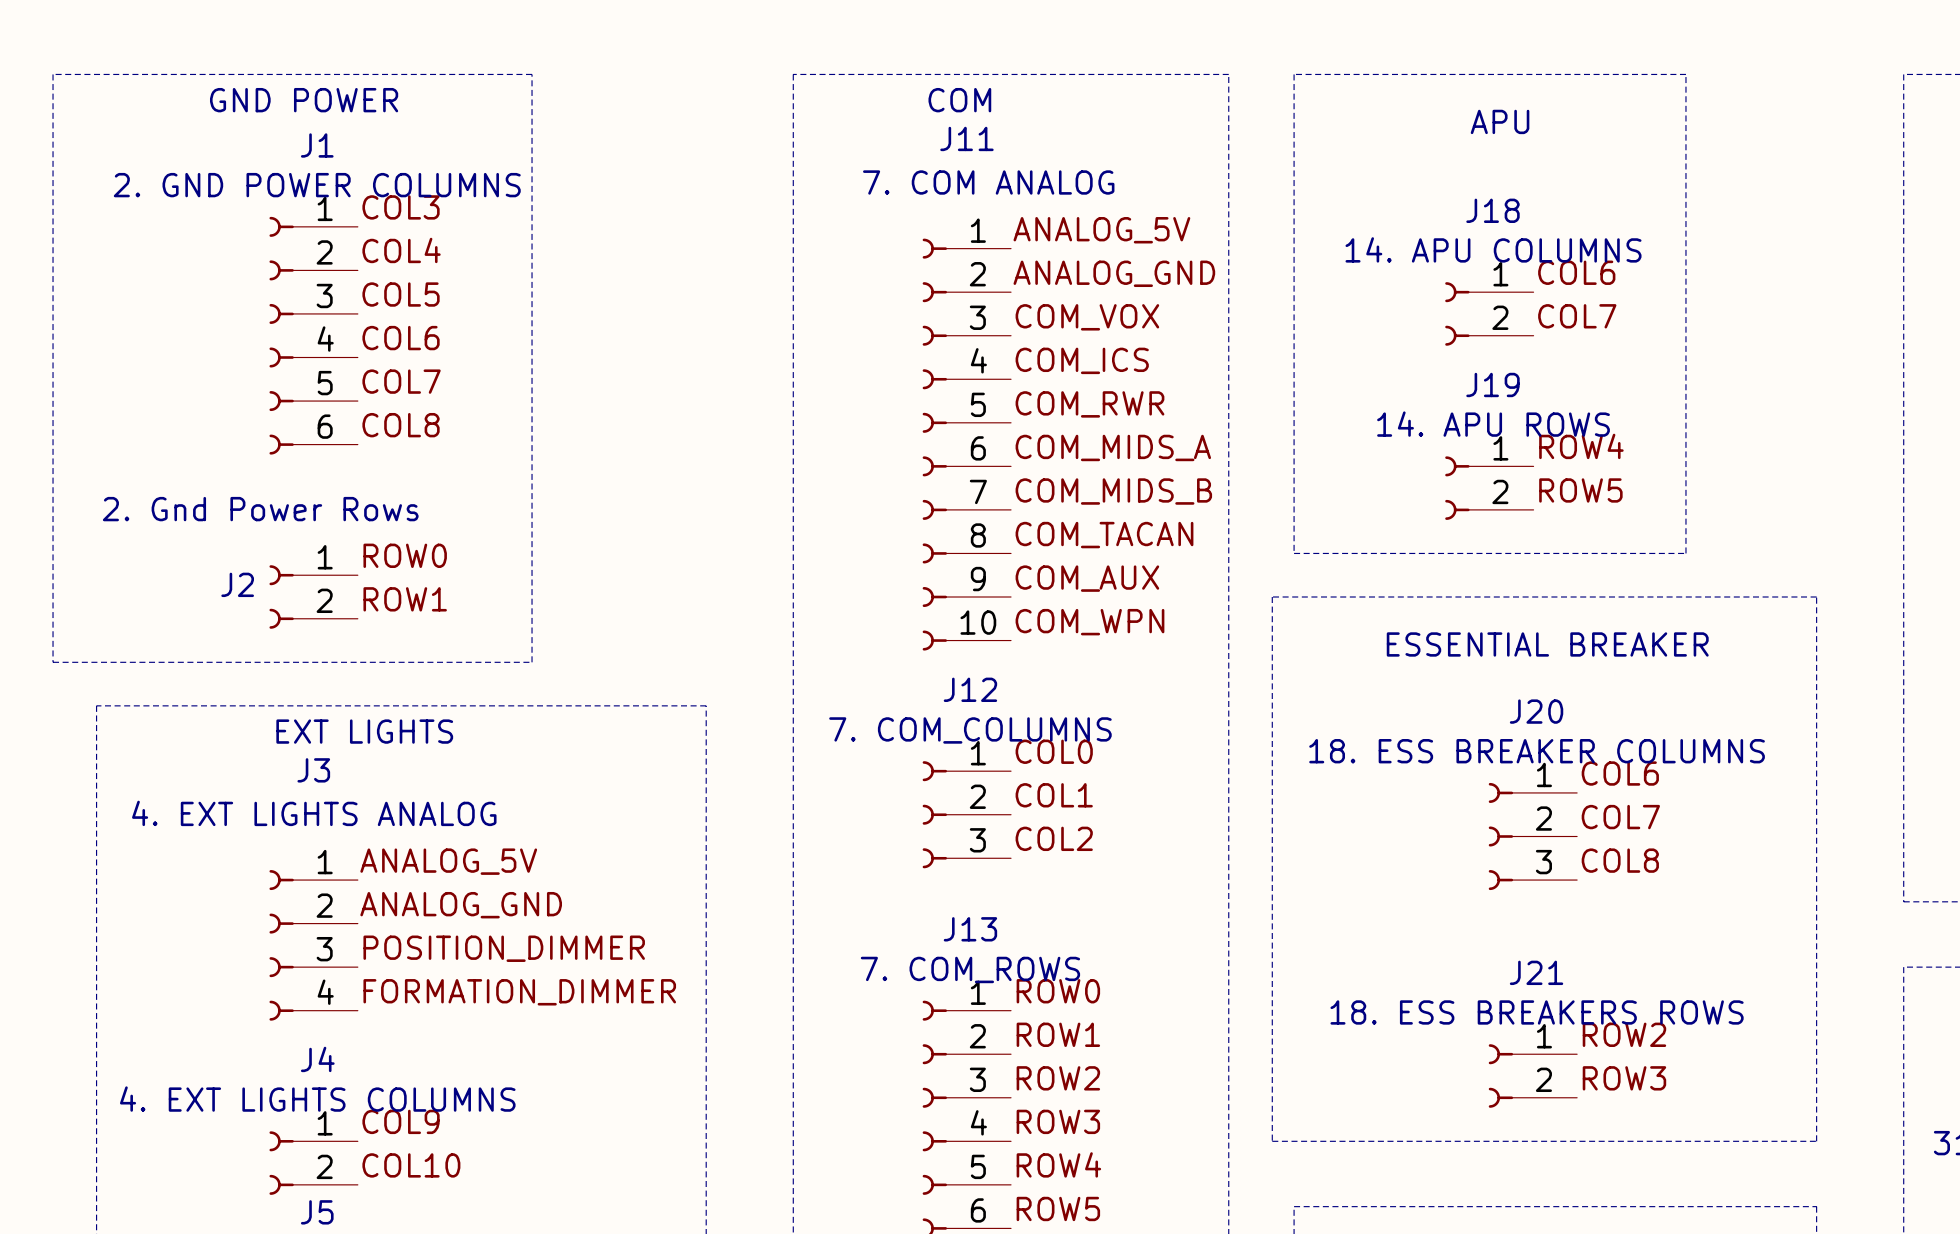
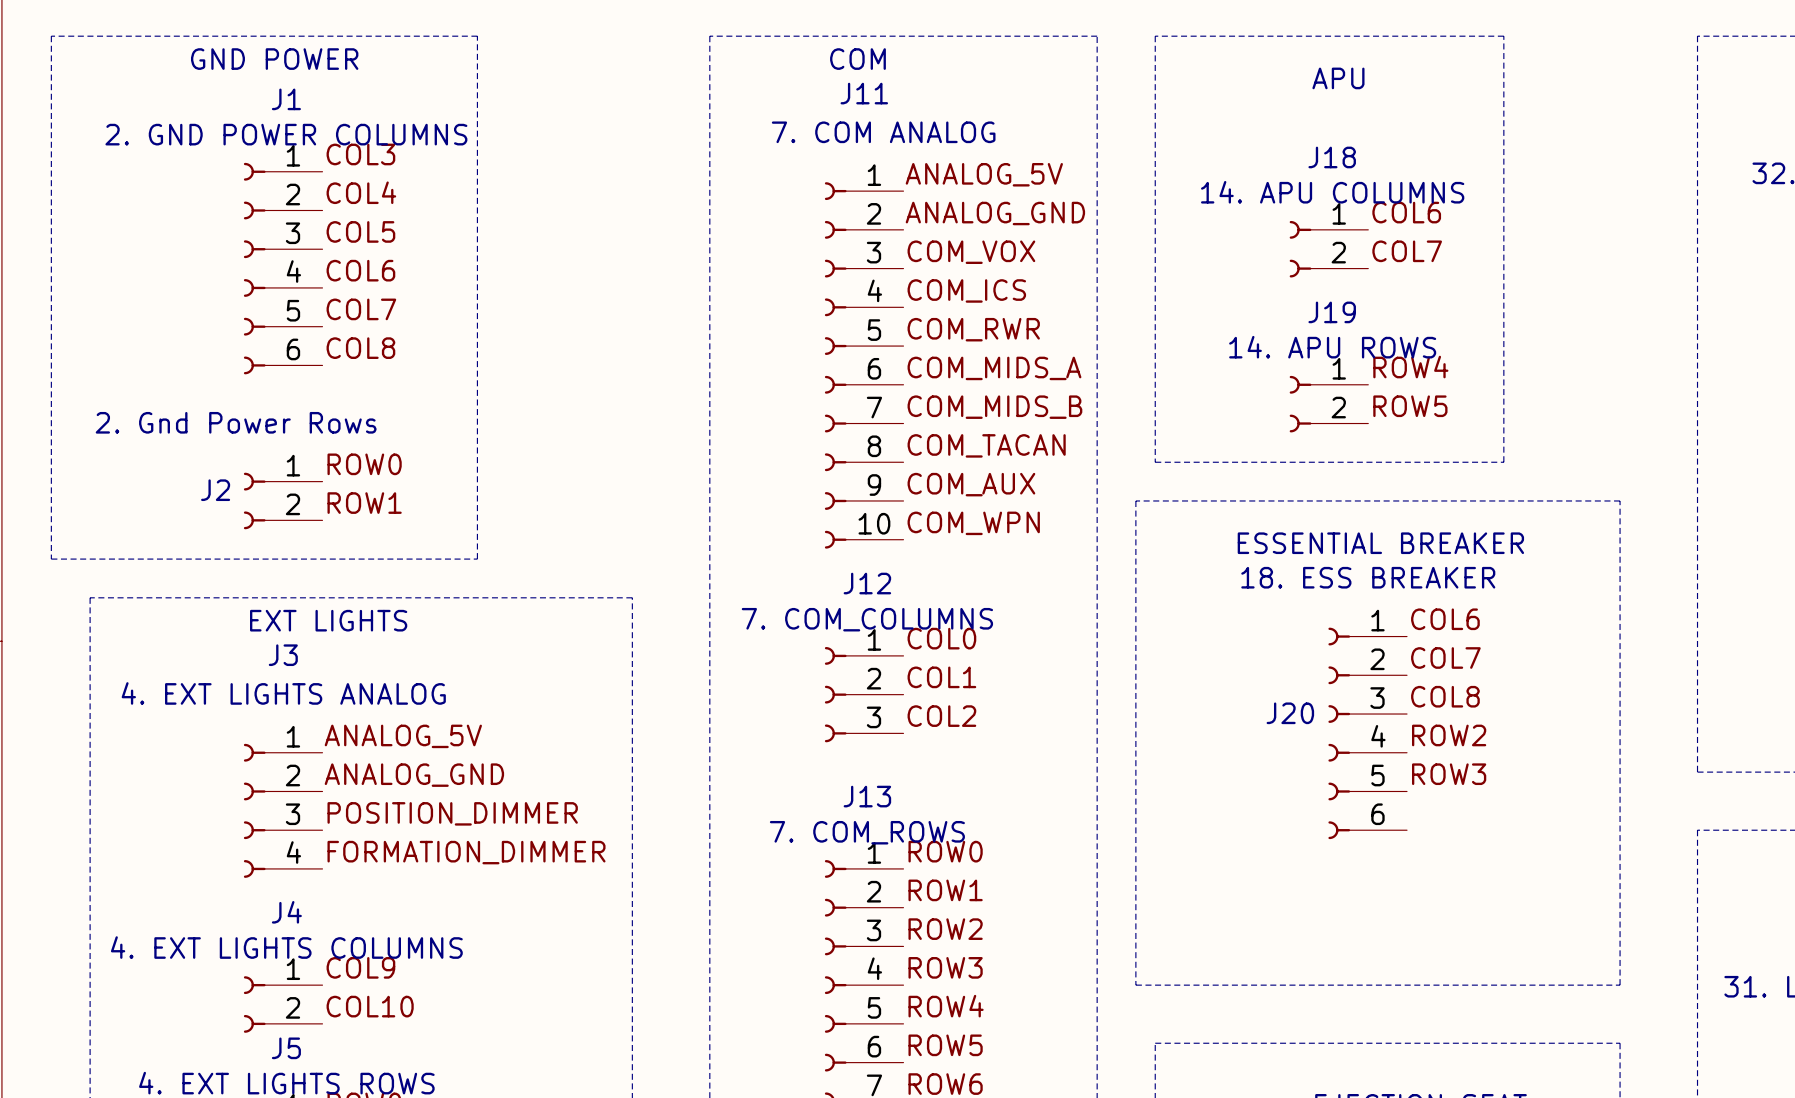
J20 name position: J20 (1536, 711) -> J20 (1290, 713)
label: none -> COL6 (1445, 619)
J20 value: 18. ESS BREAKER COLUMNS (1537, 751) -> 18. ESS BREAKER (1368, 577)
label: COL6 (1620, 773) -> COL7 (1445, 658)
J20 symbol: [1488, 782, 1578, 891] -> [1328, 627, 1408, 840]
label: COL7 (1620, 817) -> COL8 (1445, 696)
label: COL8 (1620, 860) -> ROW2 (1449, 735)
label: ROW2 (1624, 1034) -> none
J21: 18. ESS BREAKERS ROWS (1532, 1076) -> none
label position: ROW3 (1624, 1078) -> ROW3 (1449, 774)

